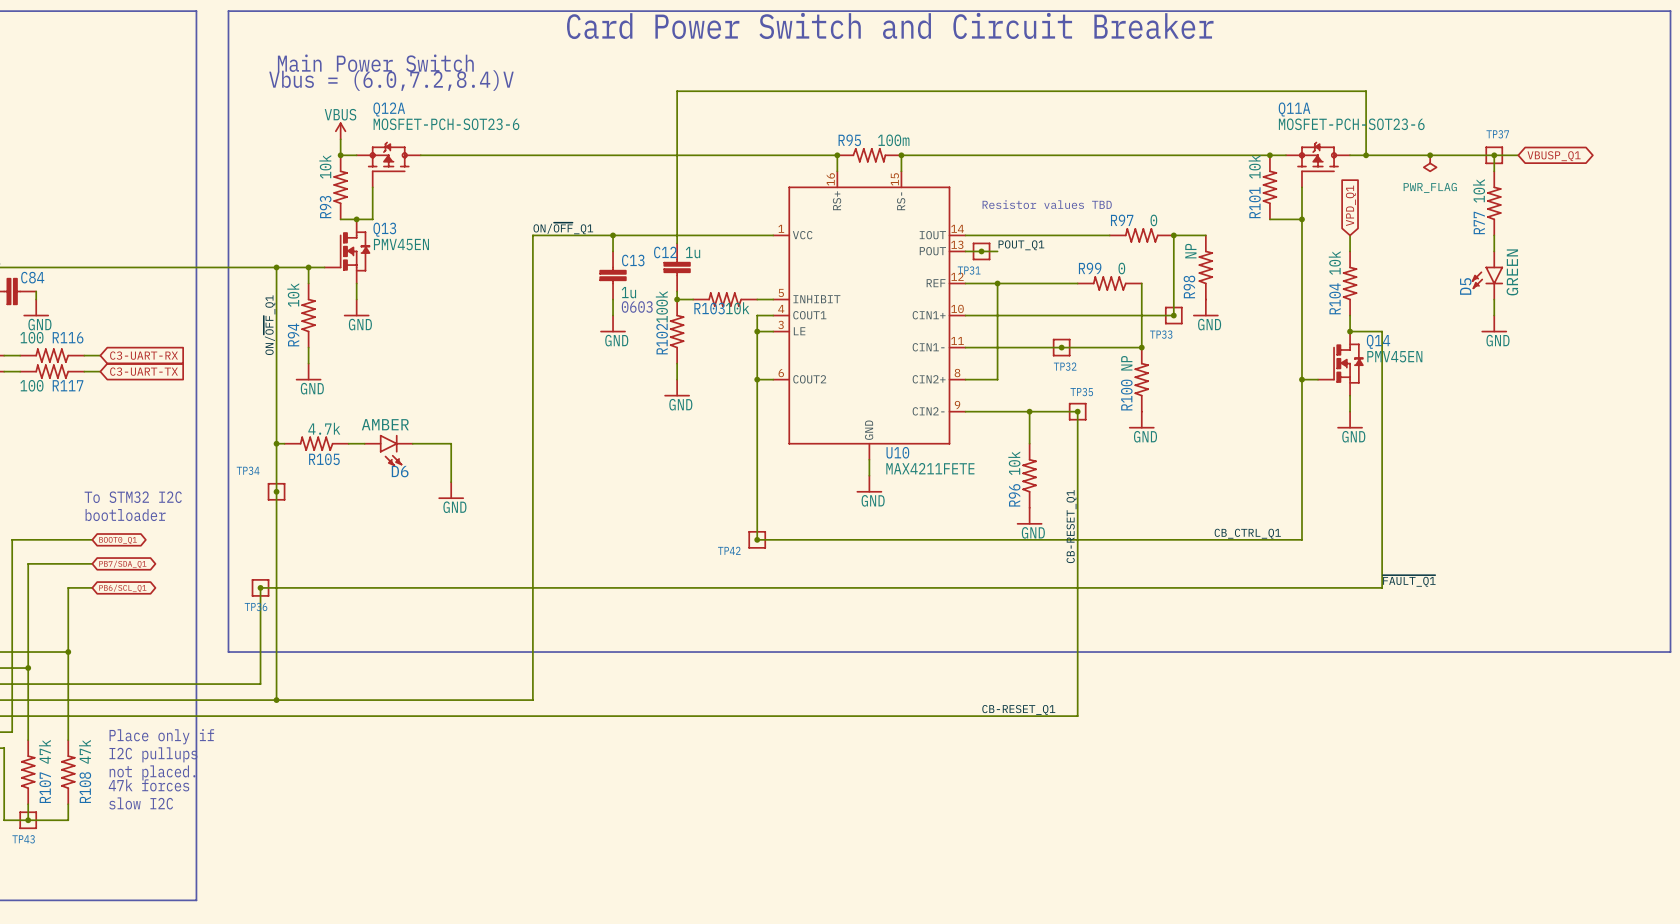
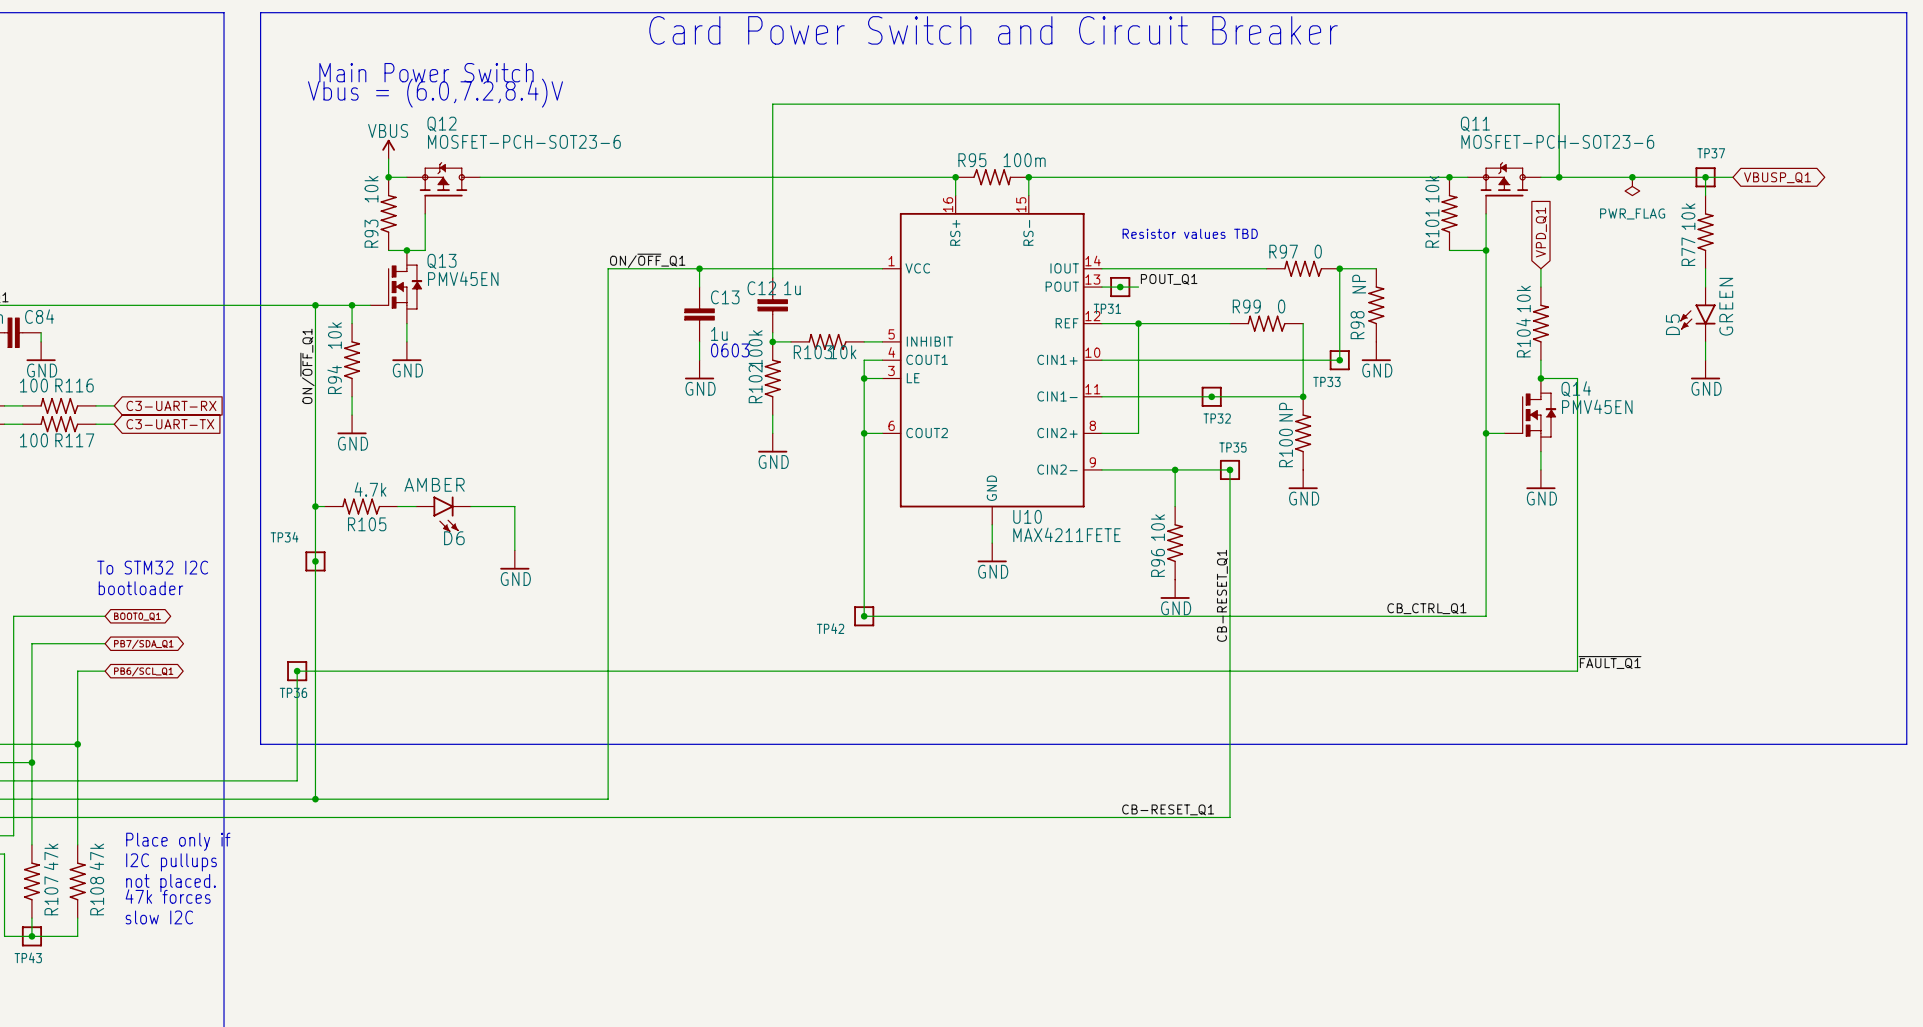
Q12A name: Q12A (389, 109) -> Q12 (441, 124)
Q11A name: Q11A (1294, 109) -> Q11 (1475, 124)

